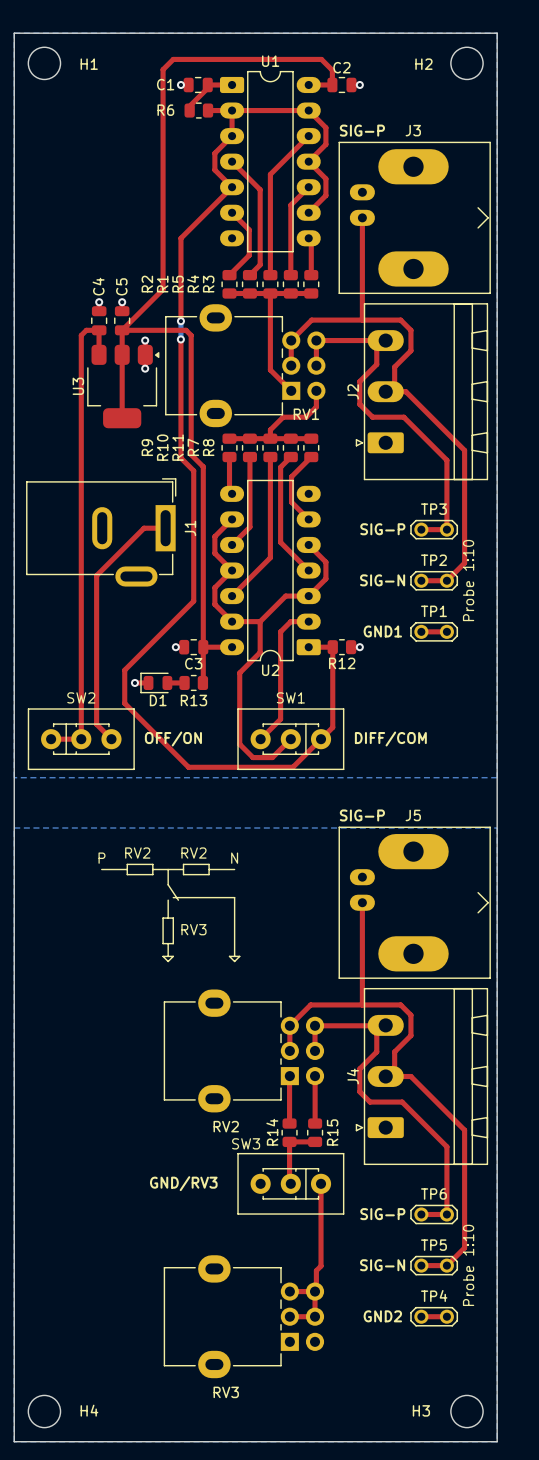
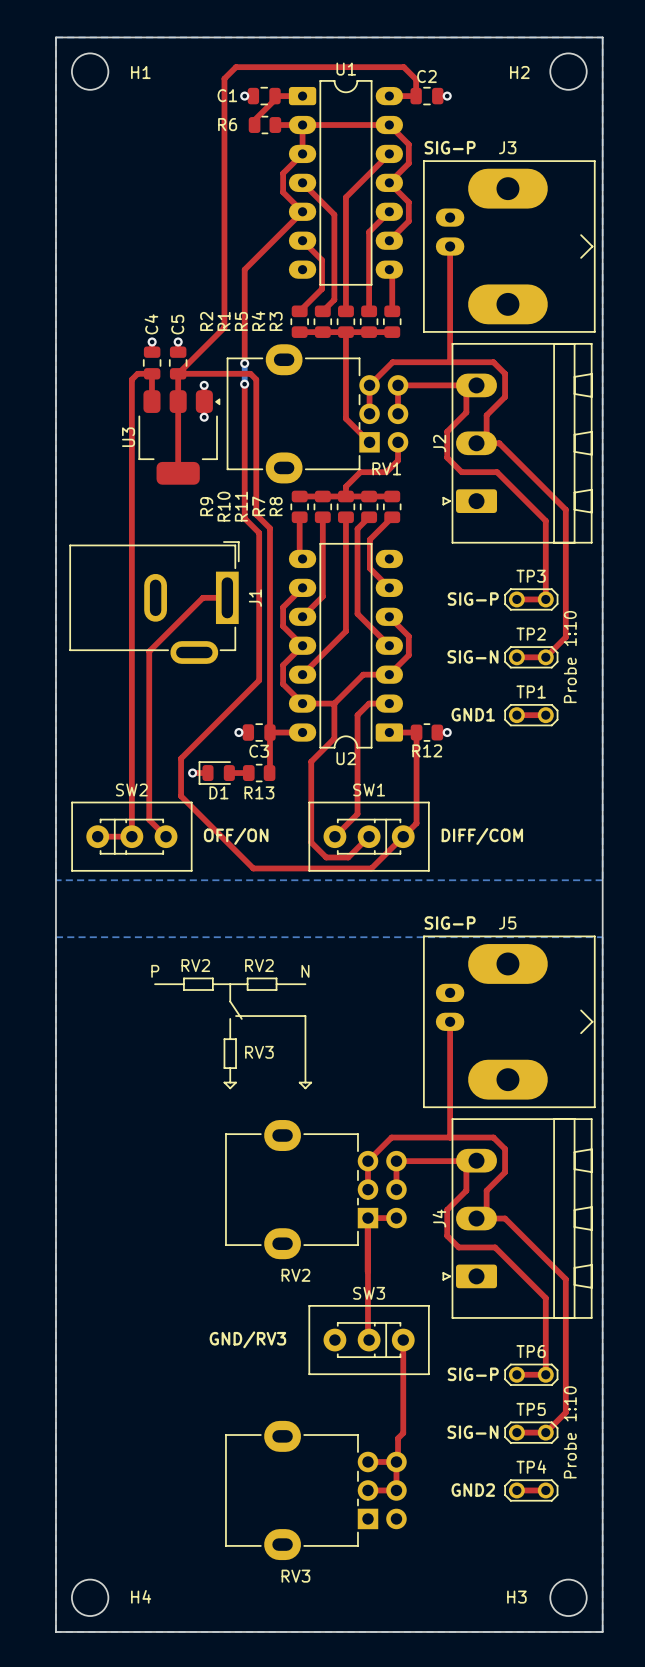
top track: (315, 1076) (315, 1123) -> (396, 1218) (367, 1218) (367, 1338)
R14: (289, 1132) -> none
R15: (315, 1132) -> none
top track: (315, 1141) (289, 1141) (289, 1182) -> none
SW3 name position: SW3 (246, 1143) -> SW3 (369, 1293)

